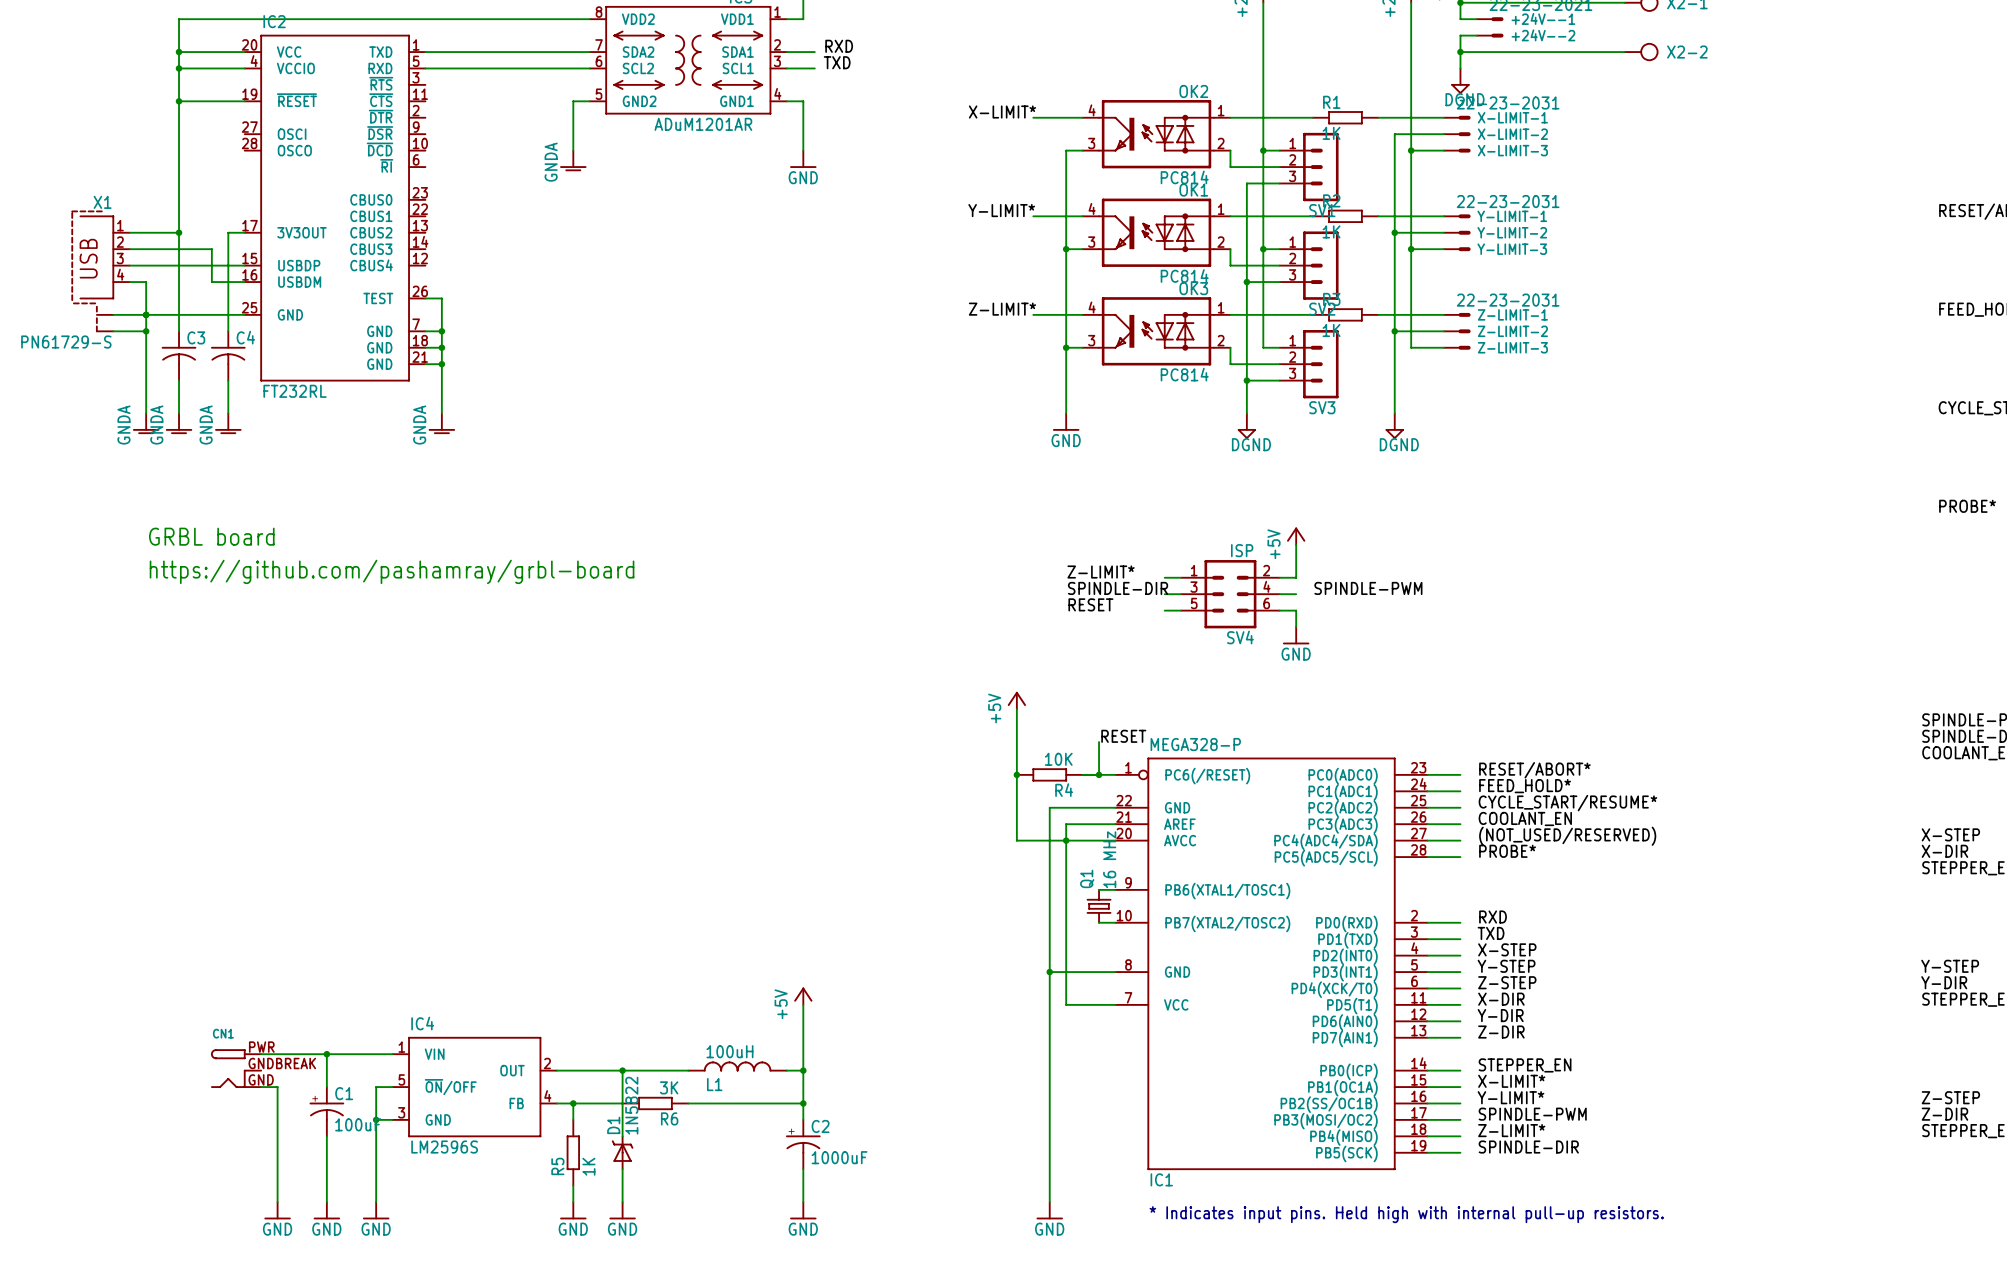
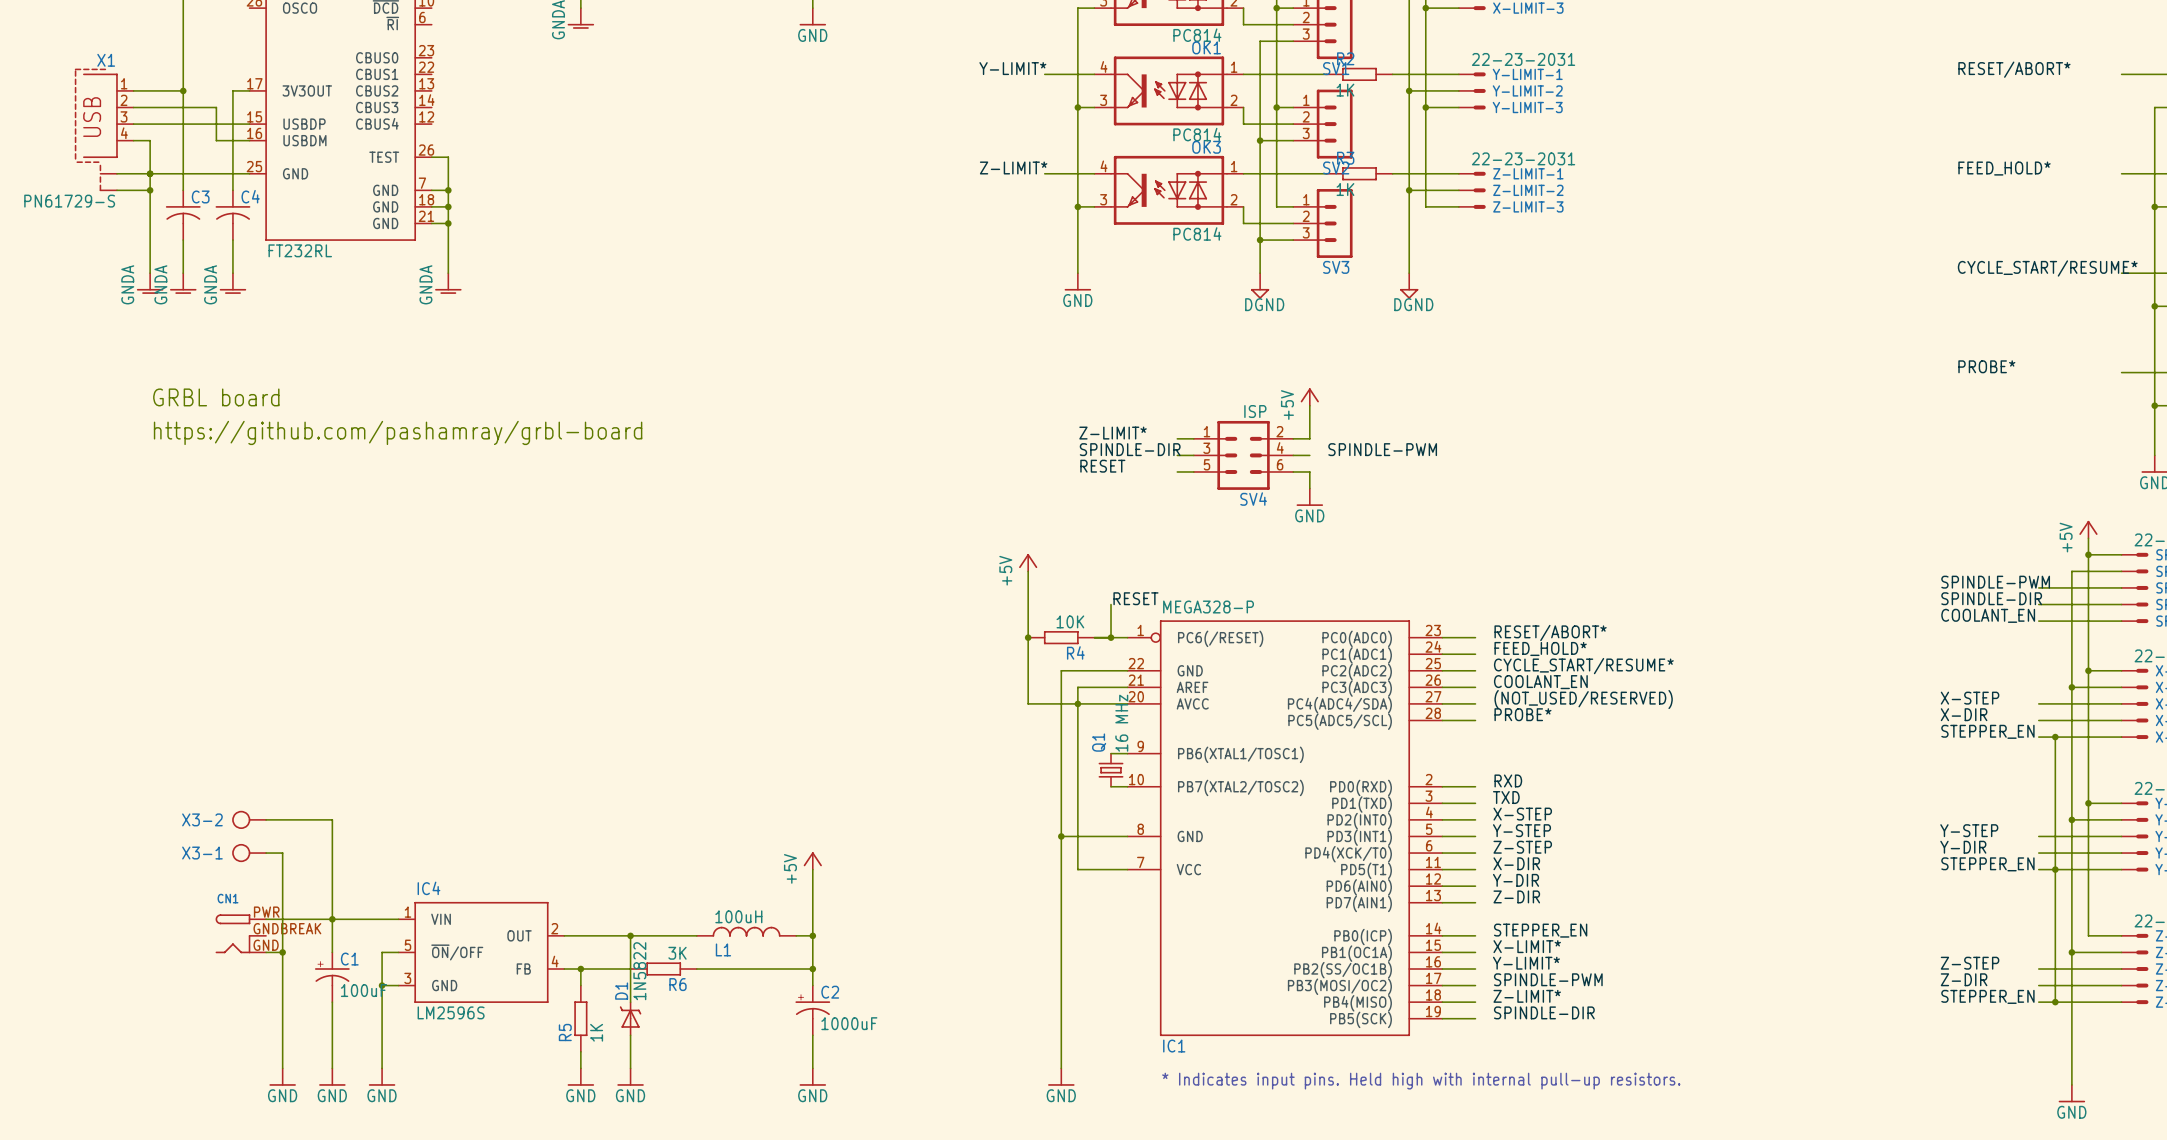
X3-2: none -> (249, 819)
wire: none -> (266, 819) (332, 819) (332, 919)
X3-1: none -> (249, 853)
wire: none -> (266, 853) (282, 853) (282, 952)
junction: none -> (282, 952)

